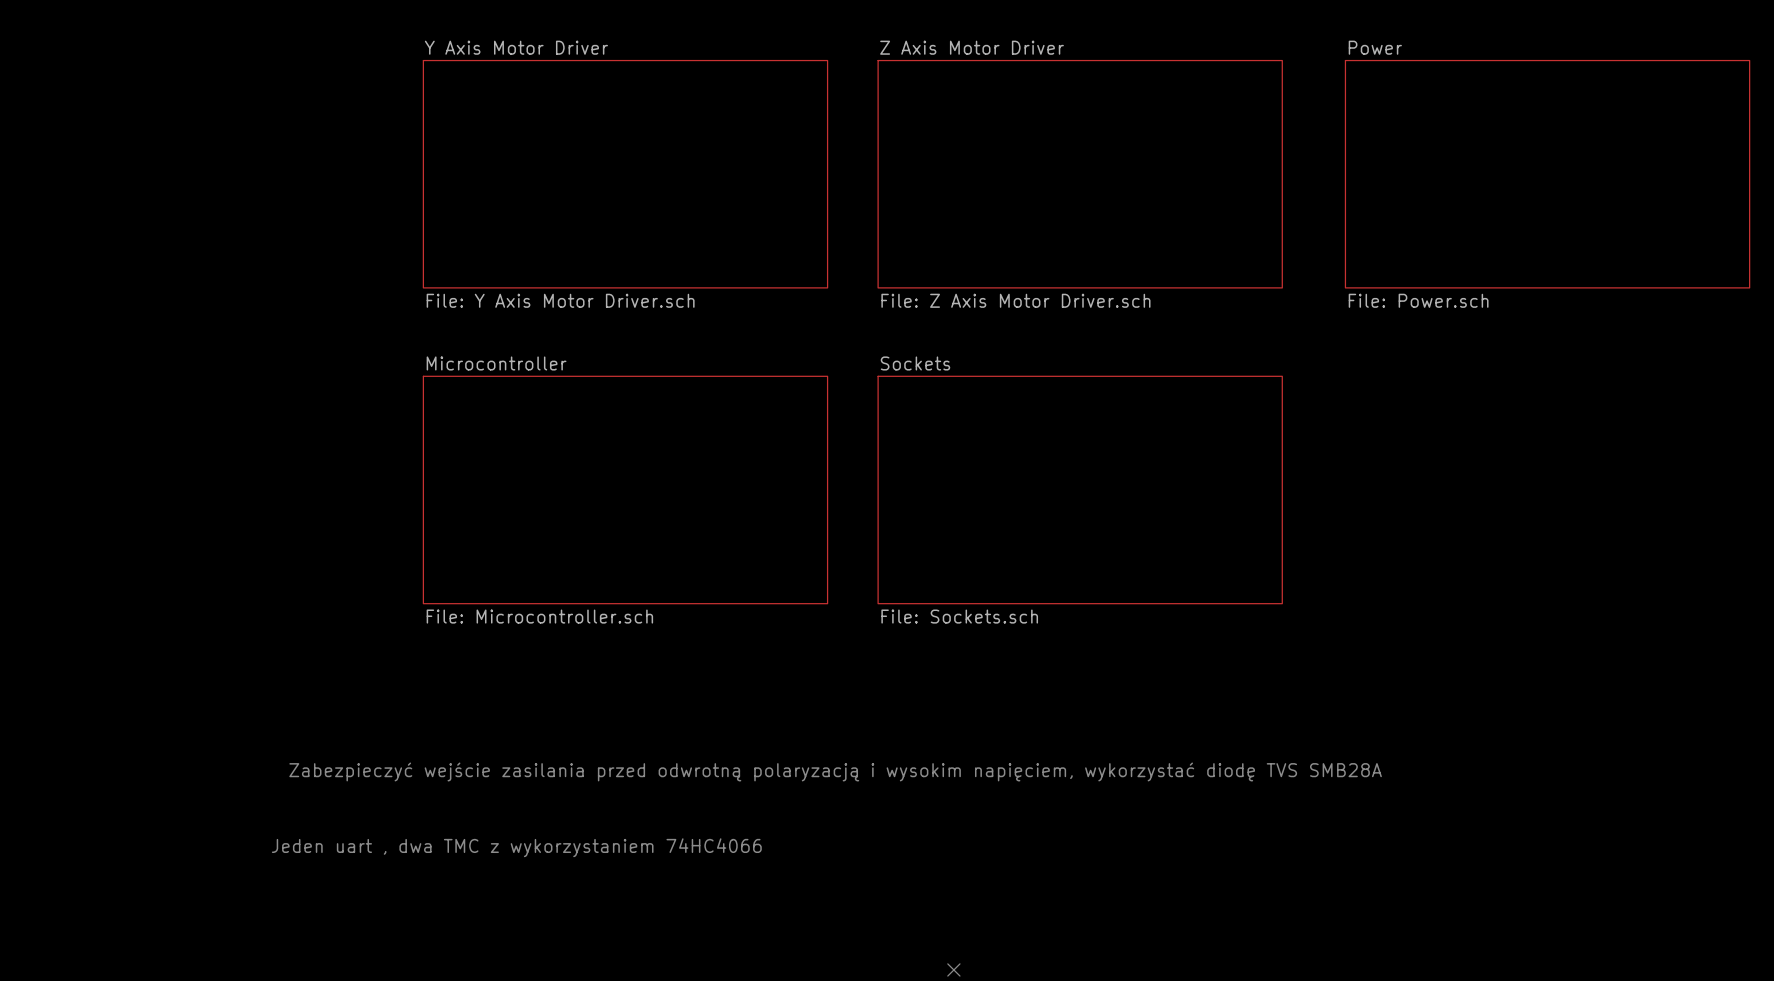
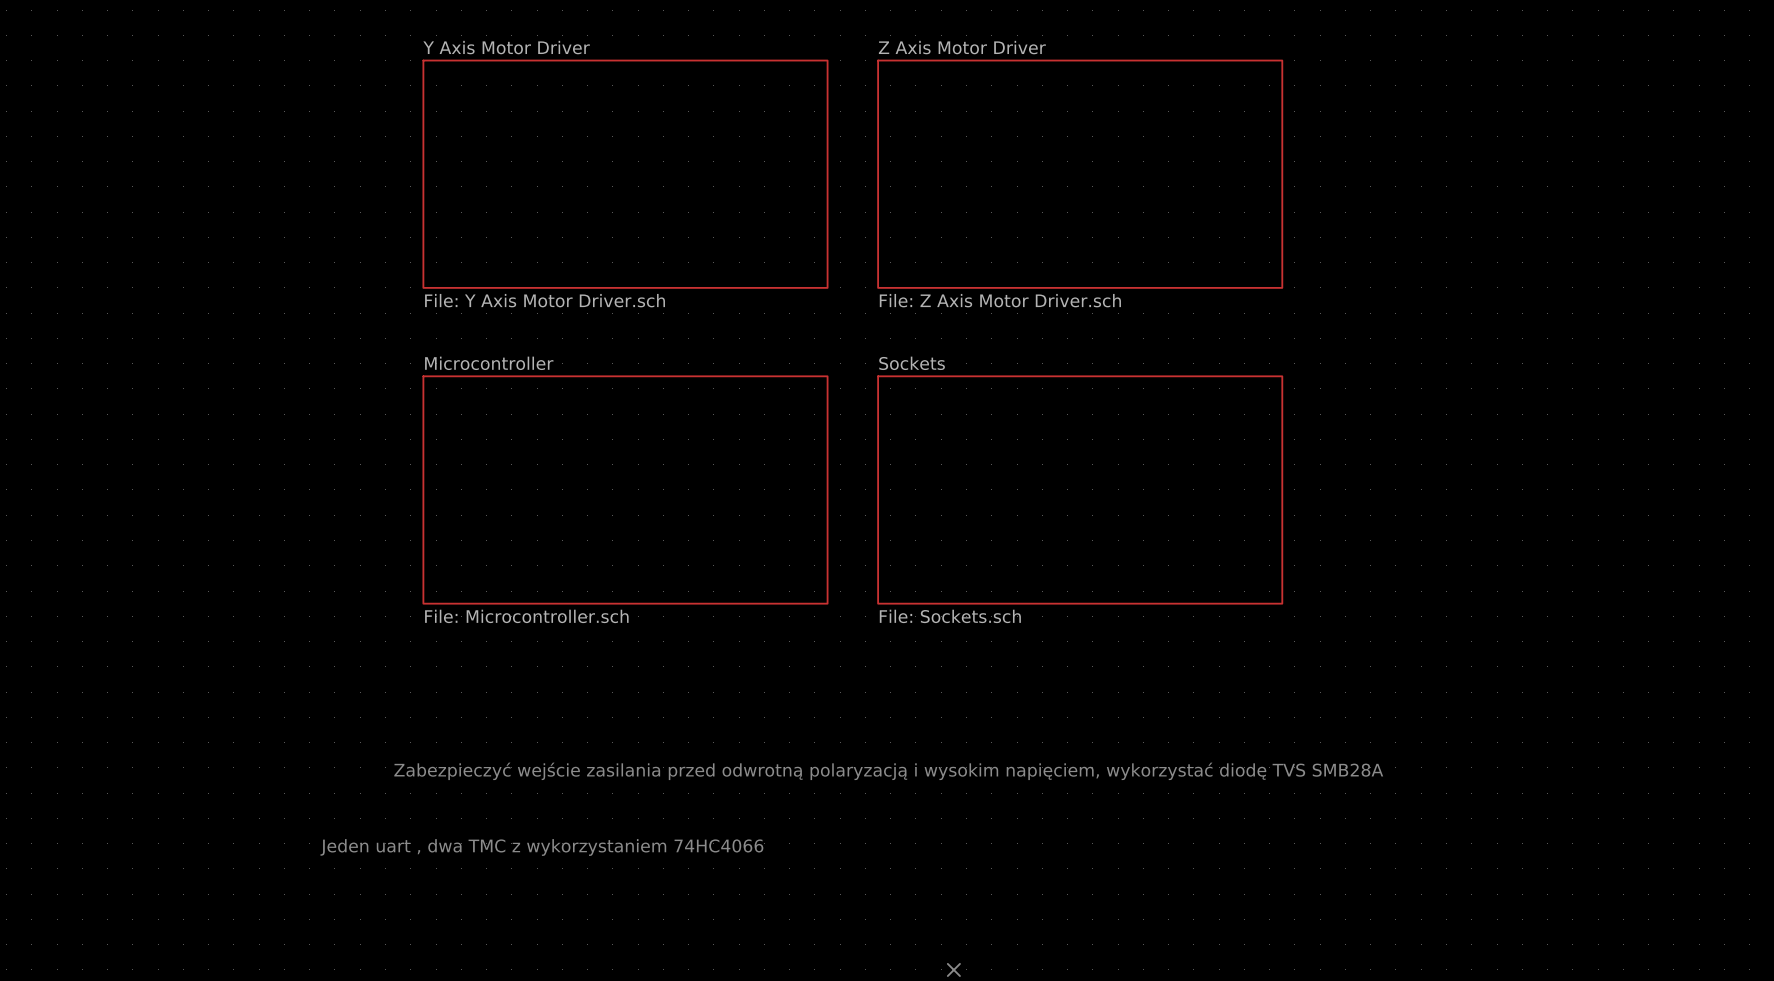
sheet Power: File: Power.sch (1547, 174) -> none

